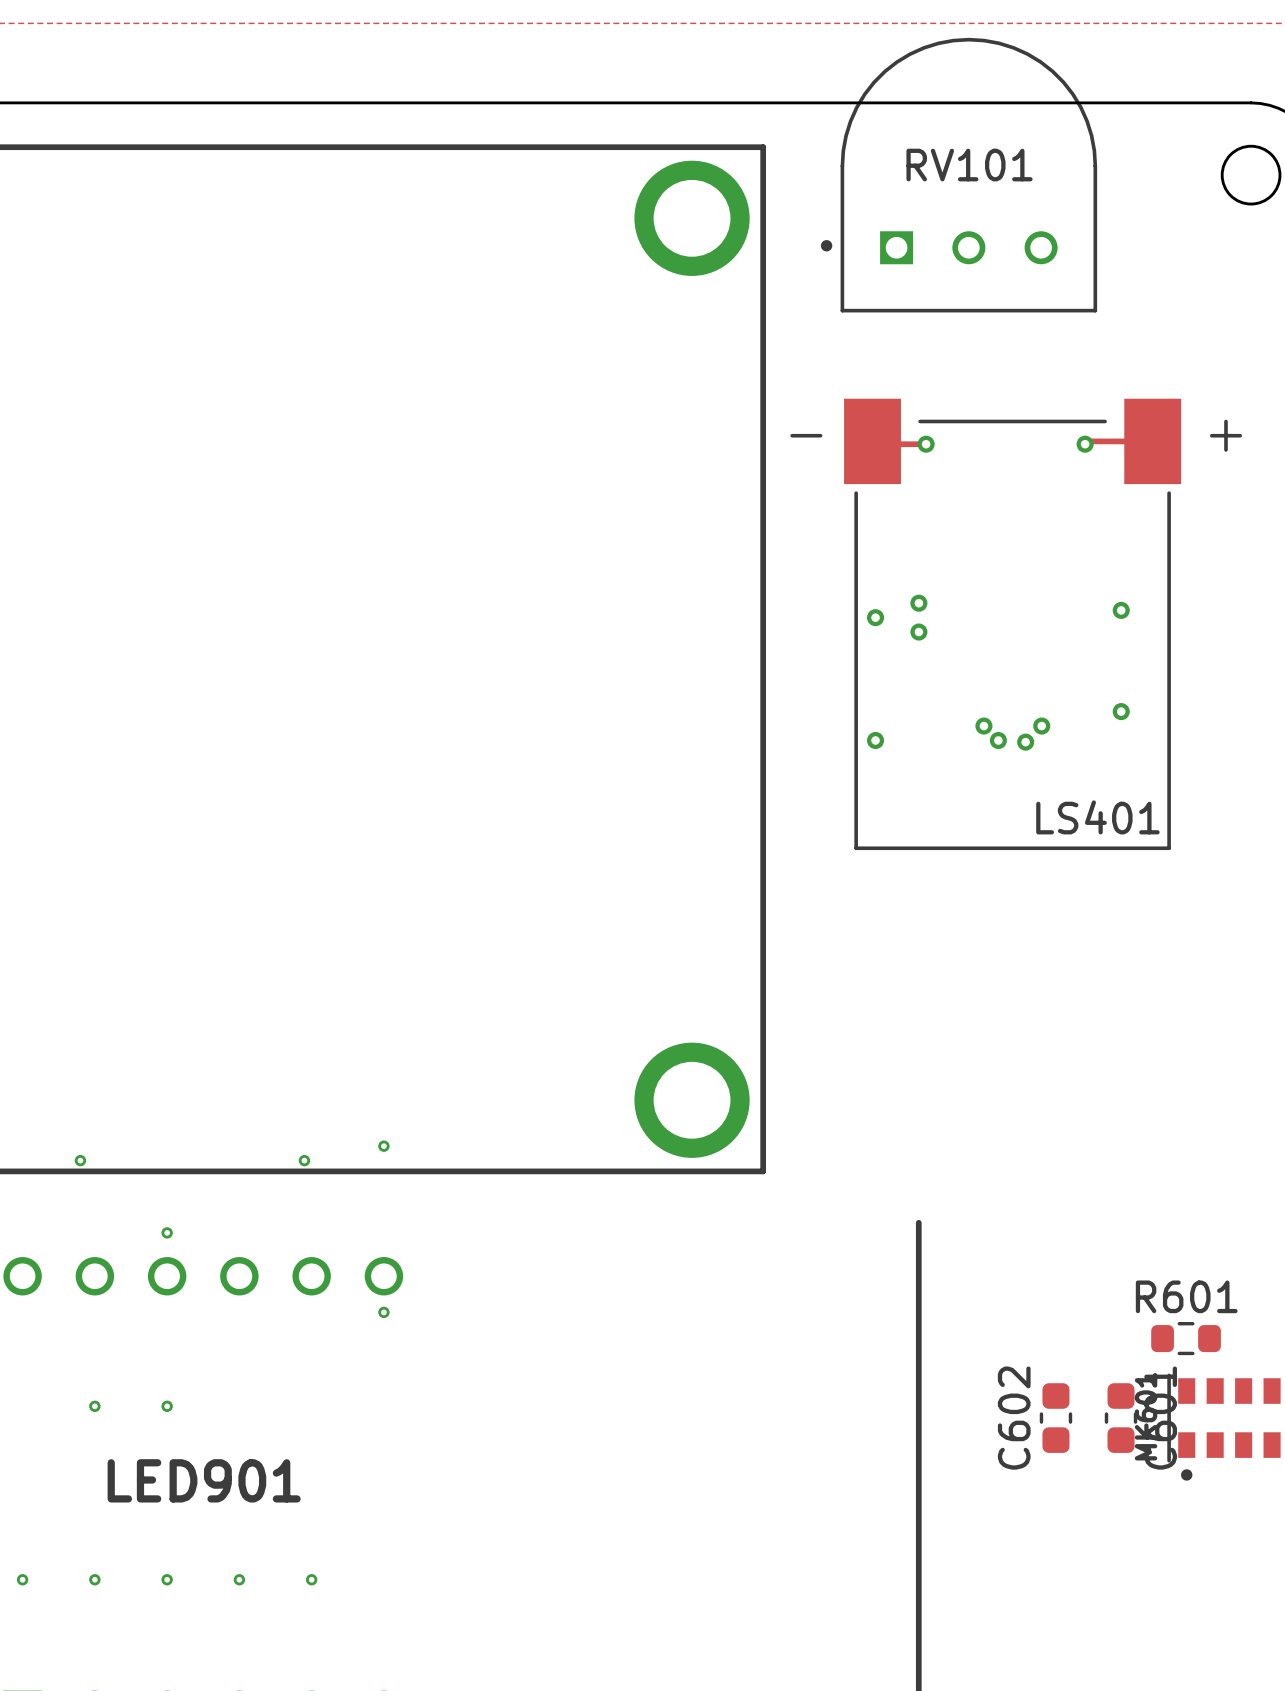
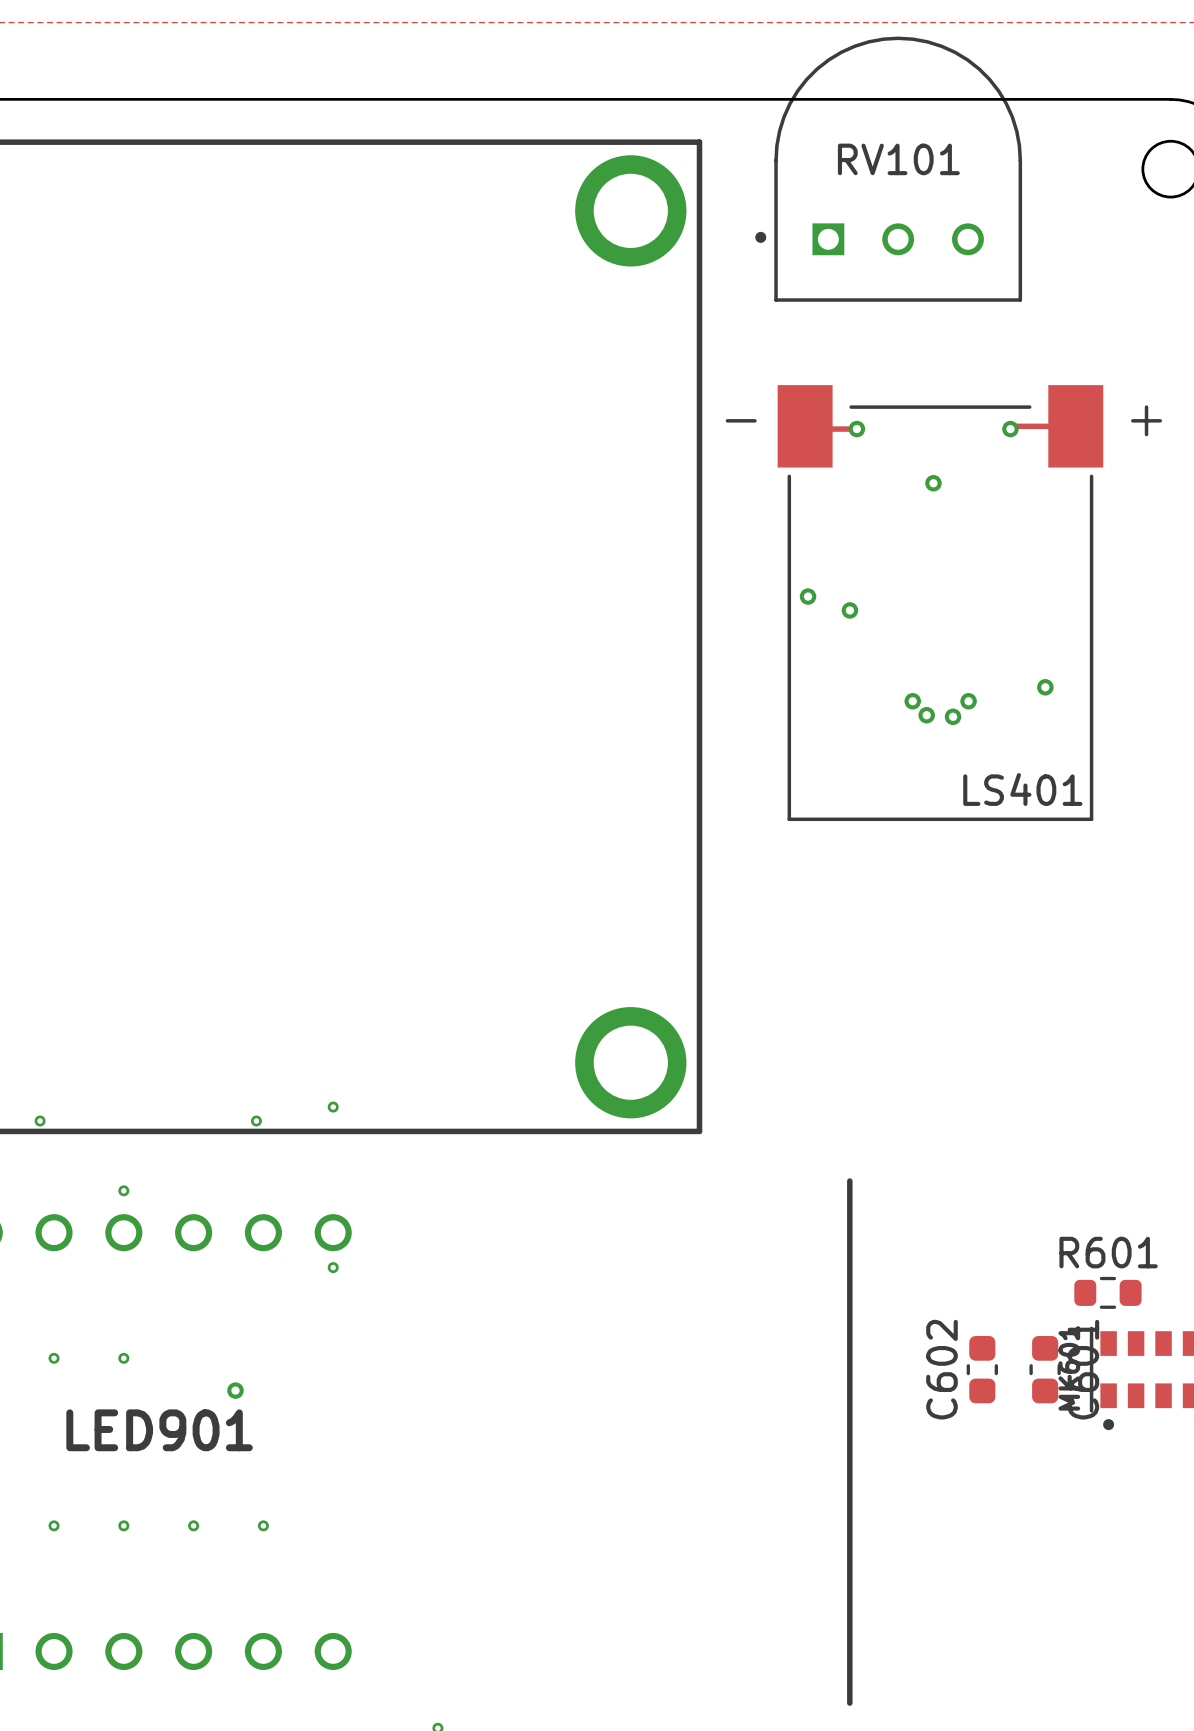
via: none -> (933, 483)
via: (918, 603) -> none
via: (1121, 610) -> none
via: (875, 740) -> none
via: none -> (235, 1390)

